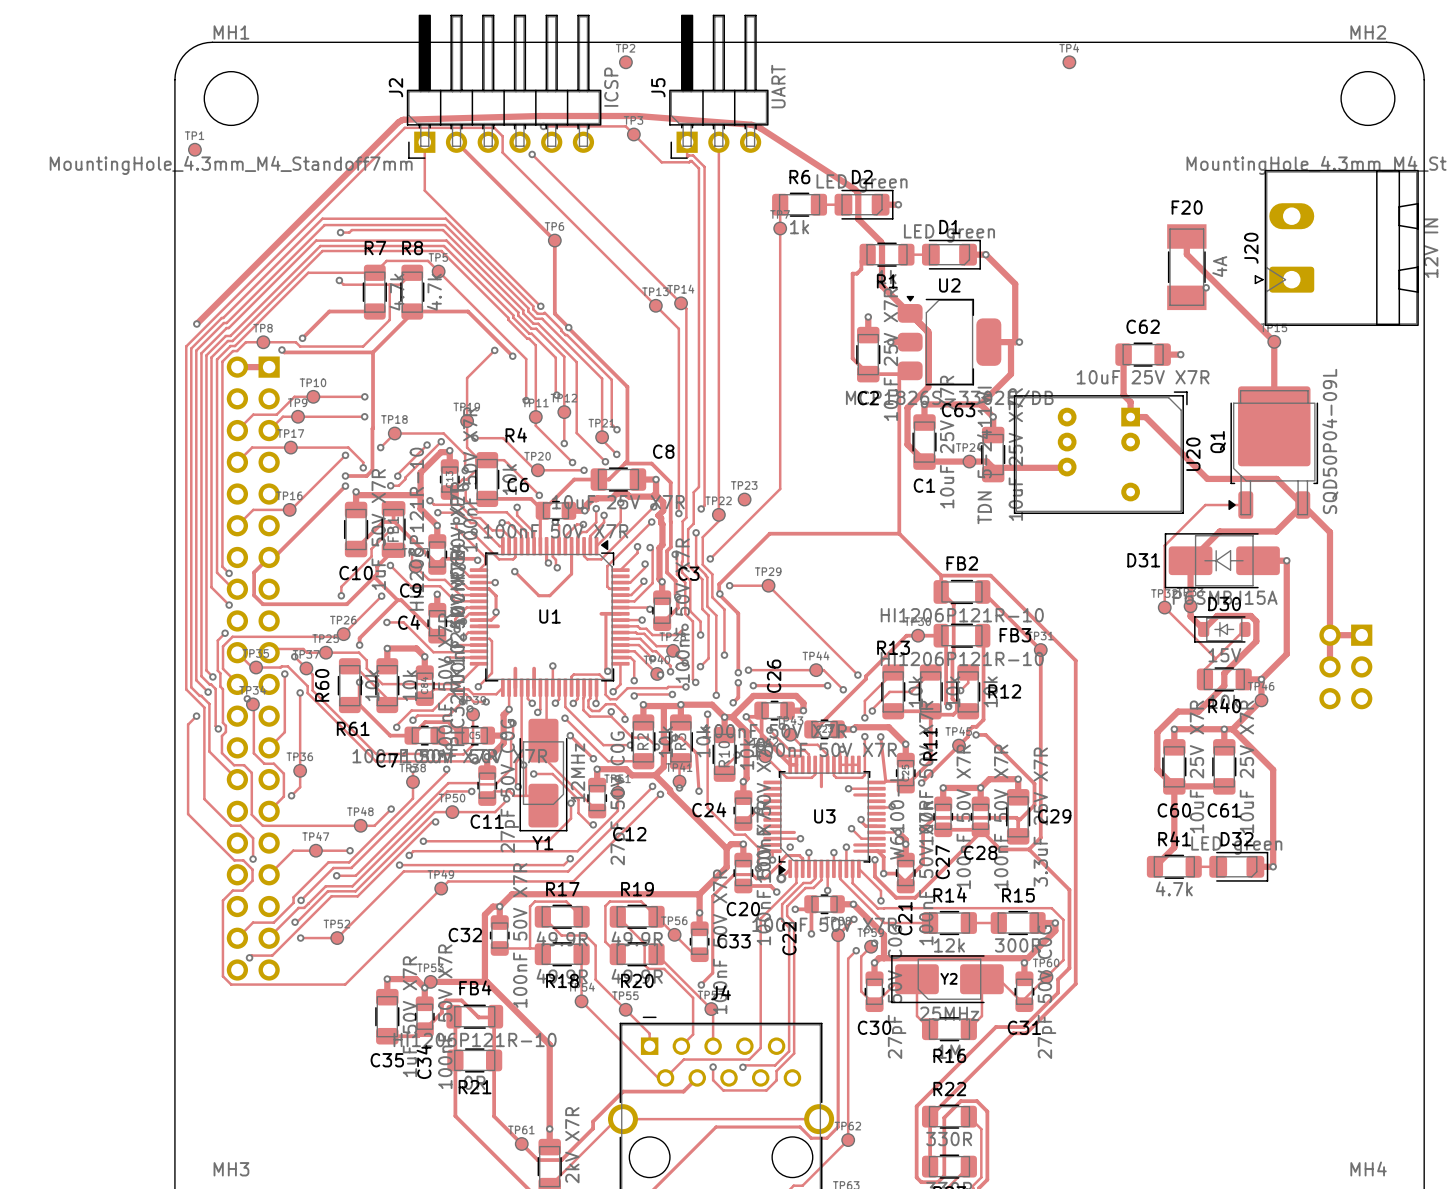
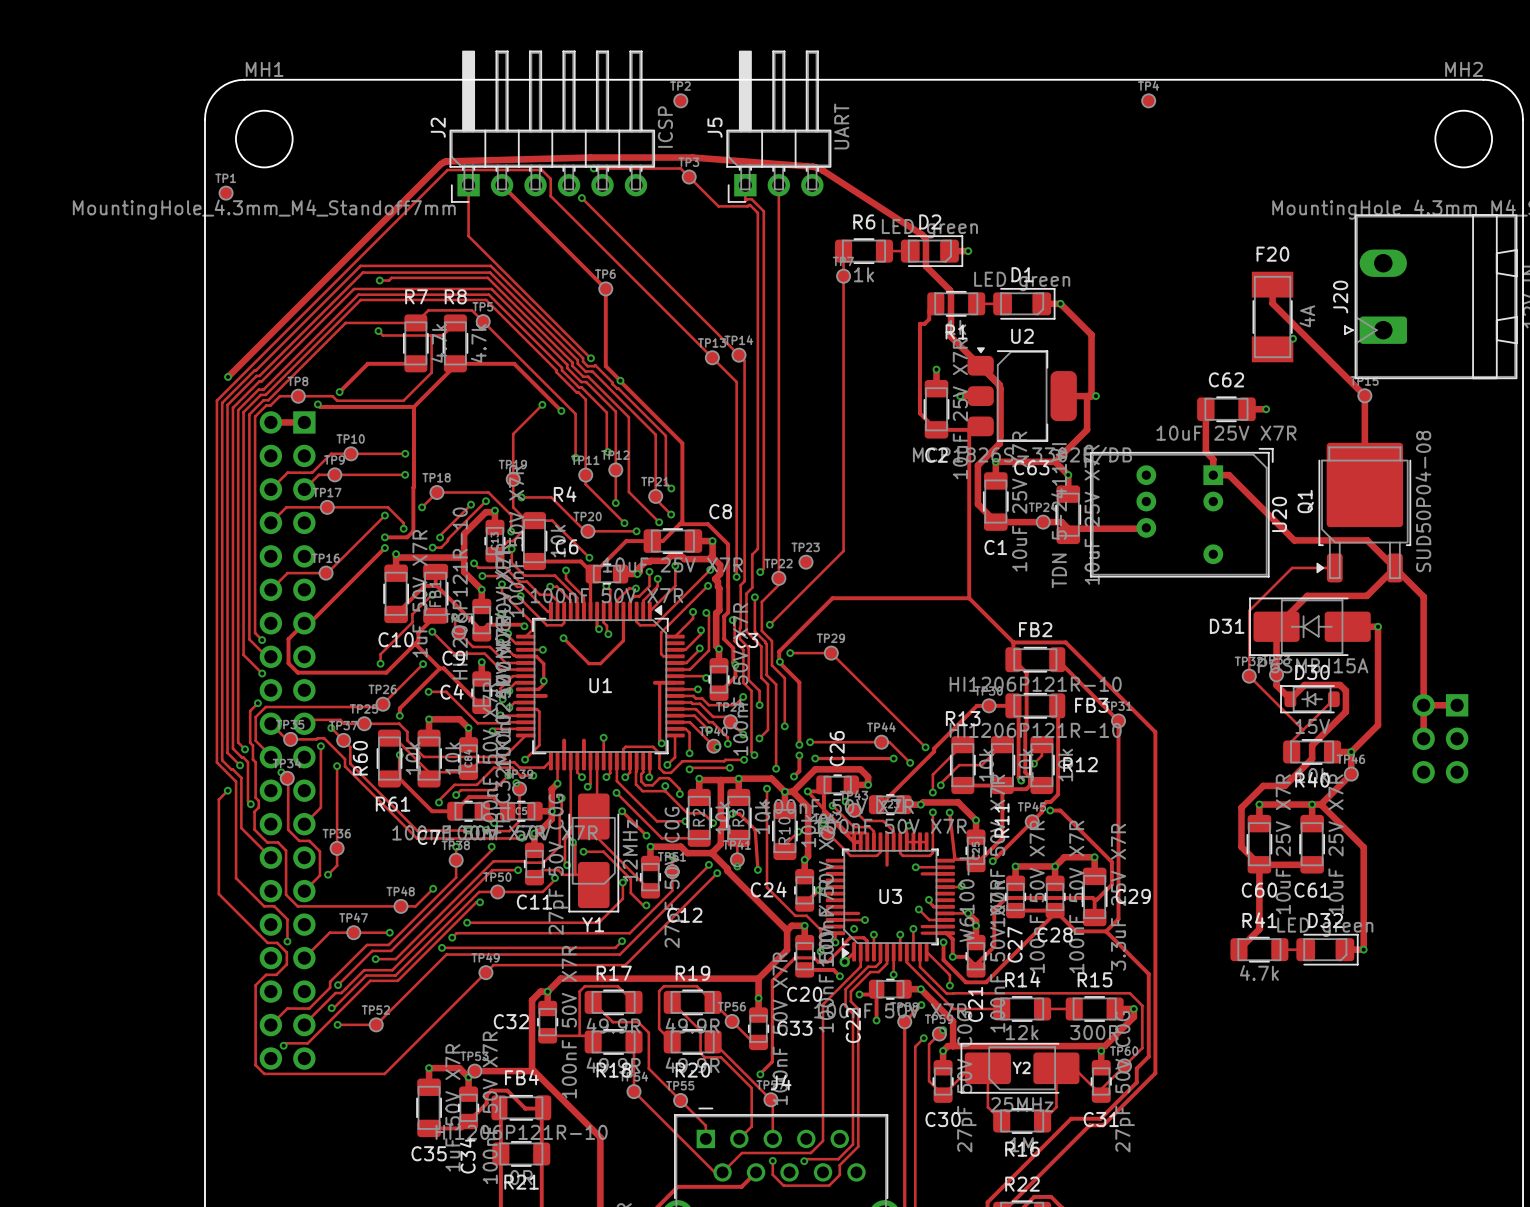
Q1 value: SQD50P04-09L (1330, 441) -> SUD50P04-08 (1423, 501)

